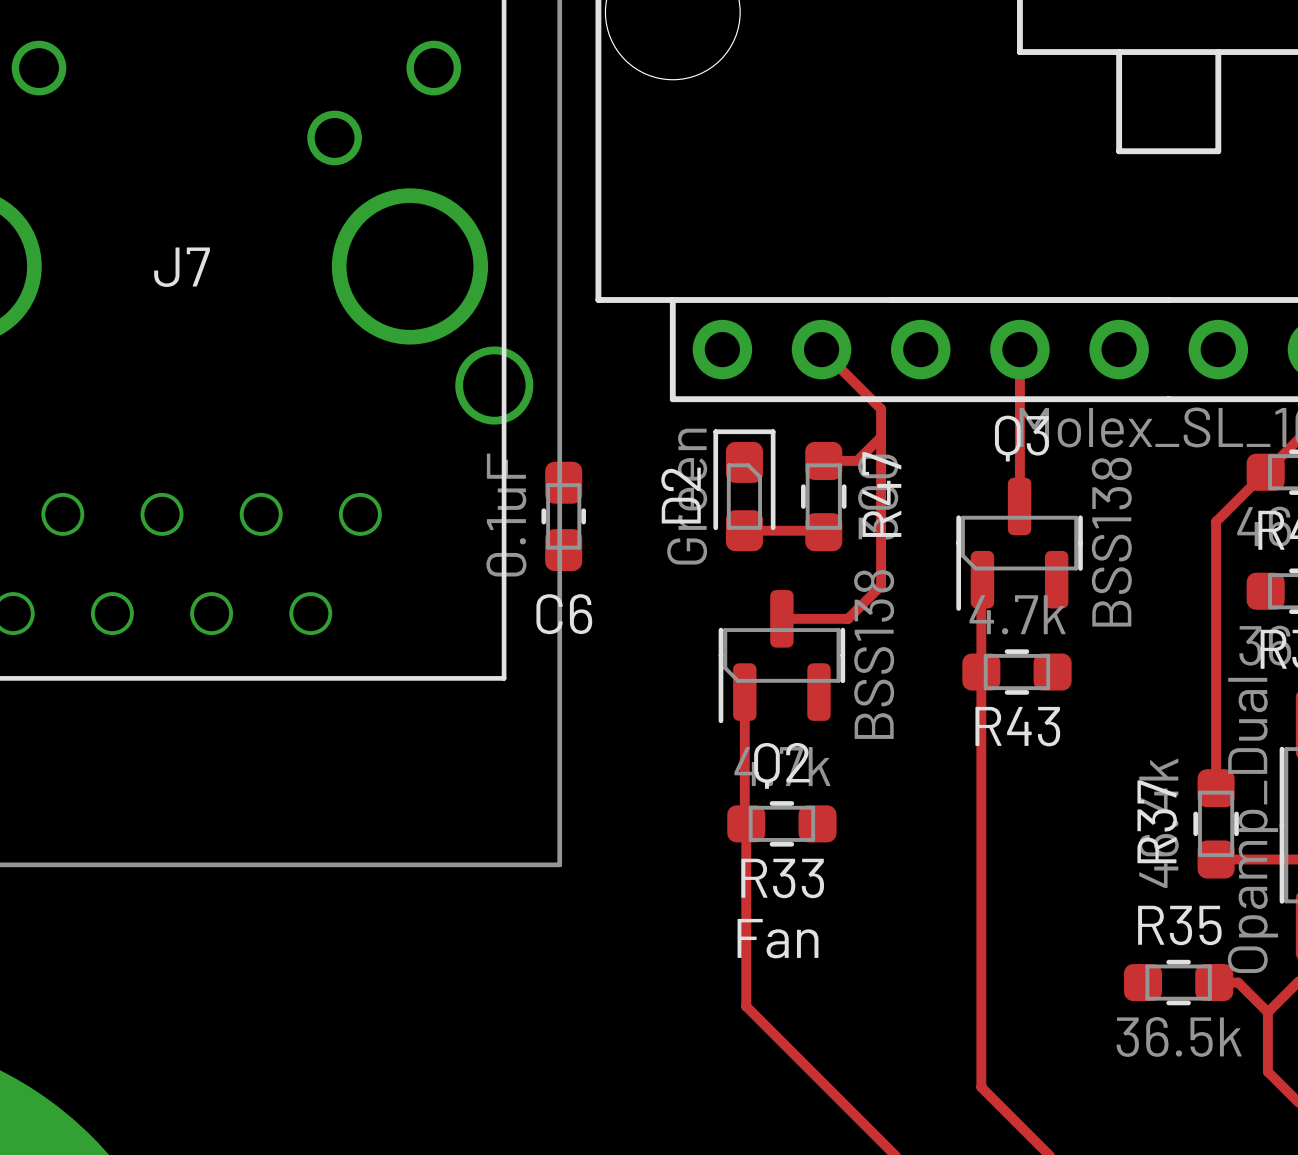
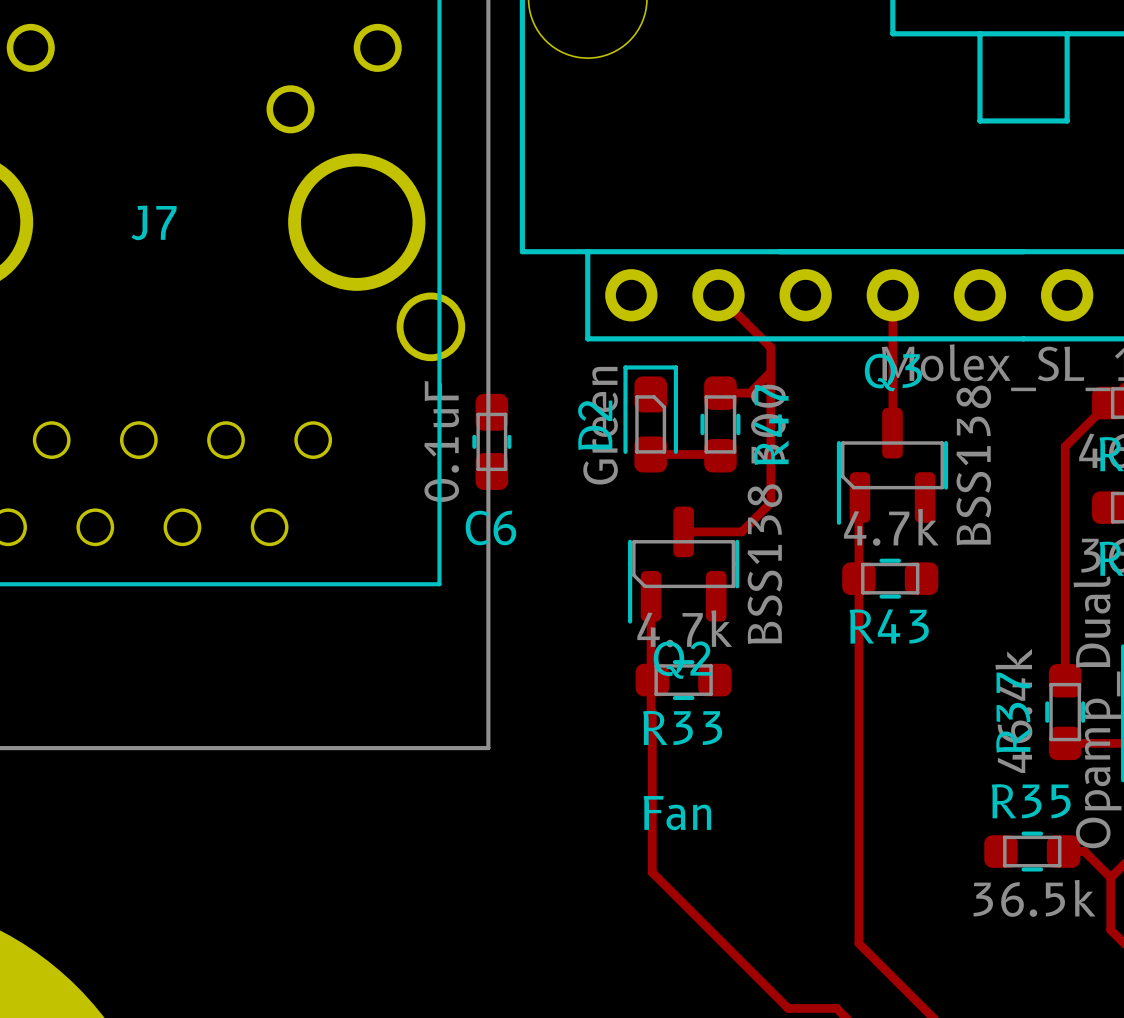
R33 position: (781, 823) -> (683, 680)

